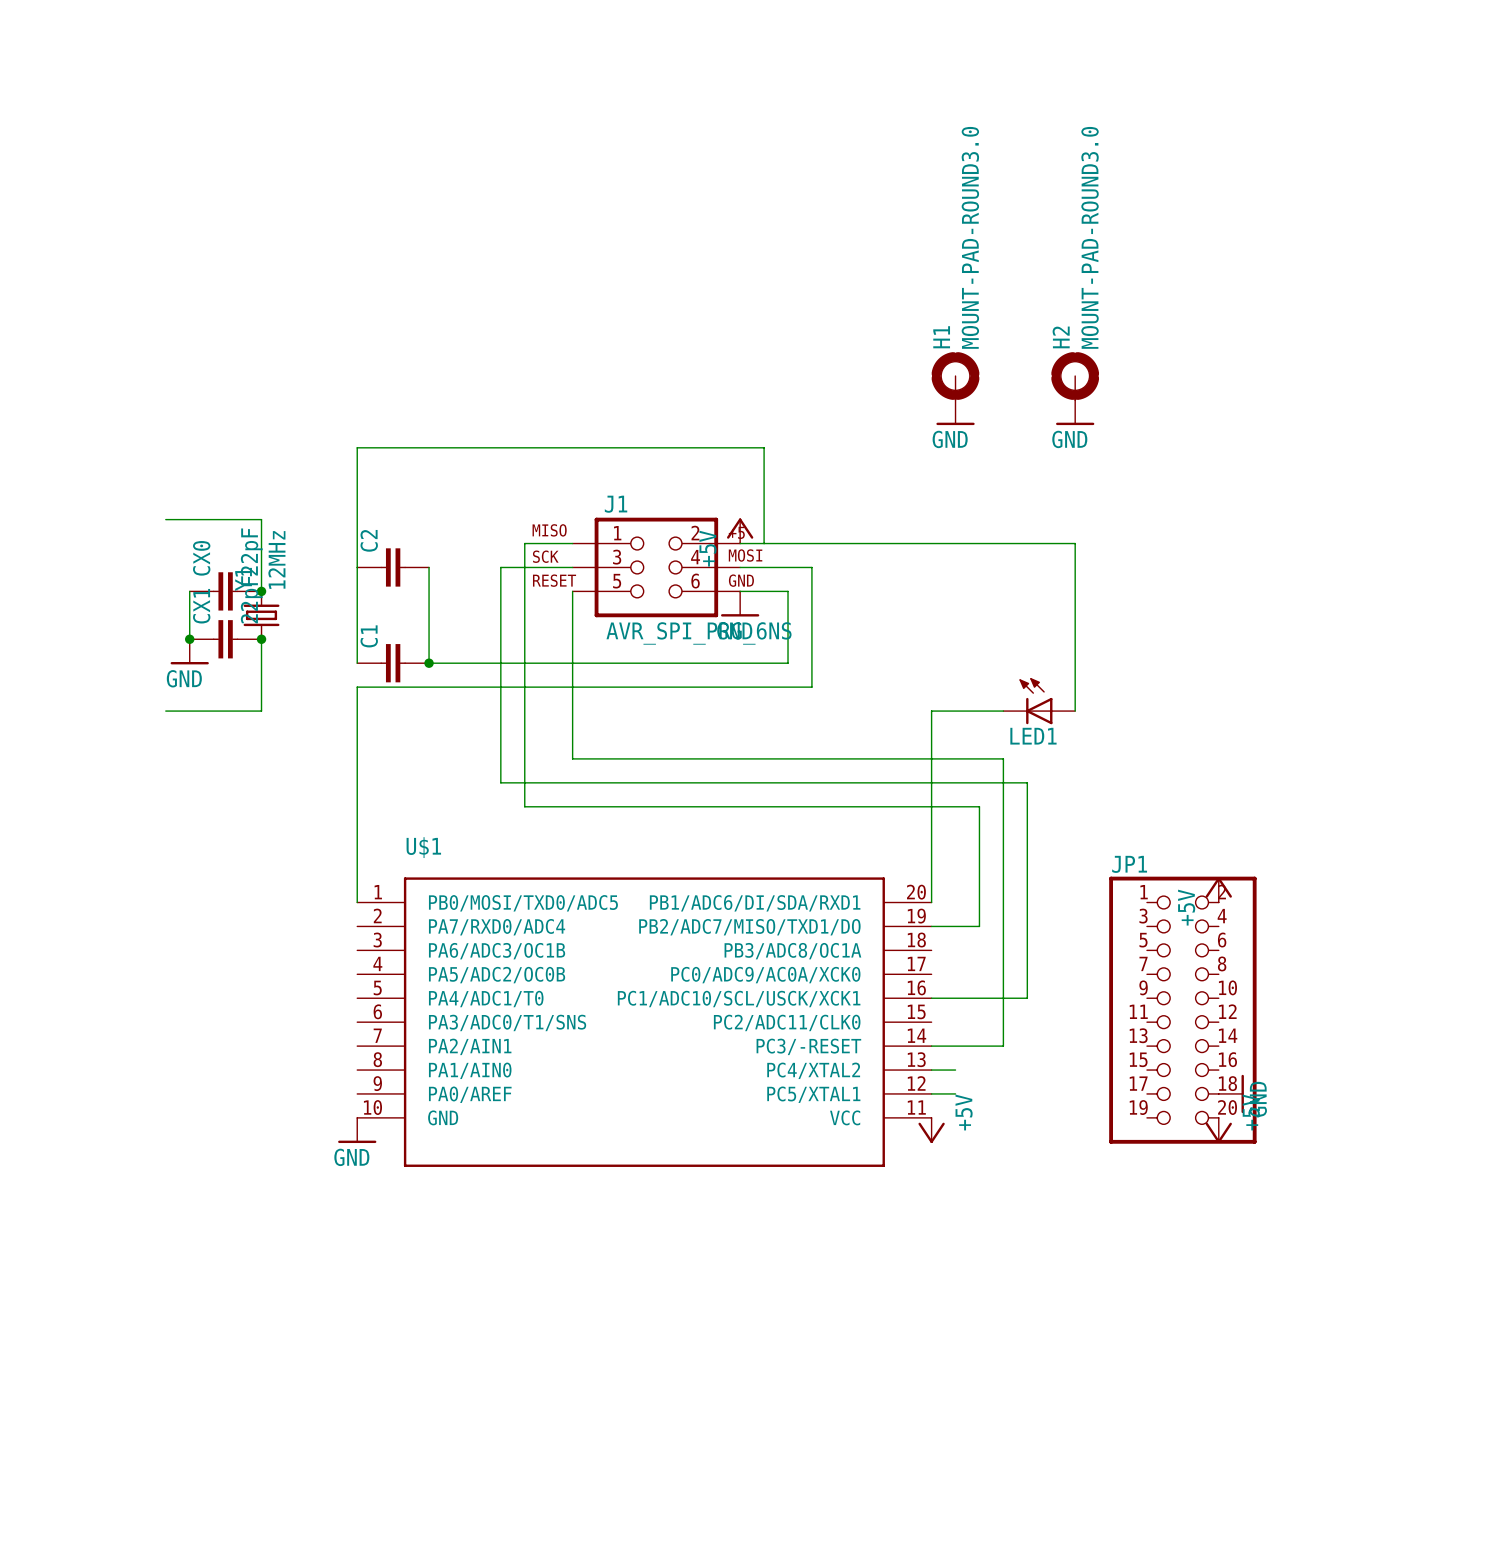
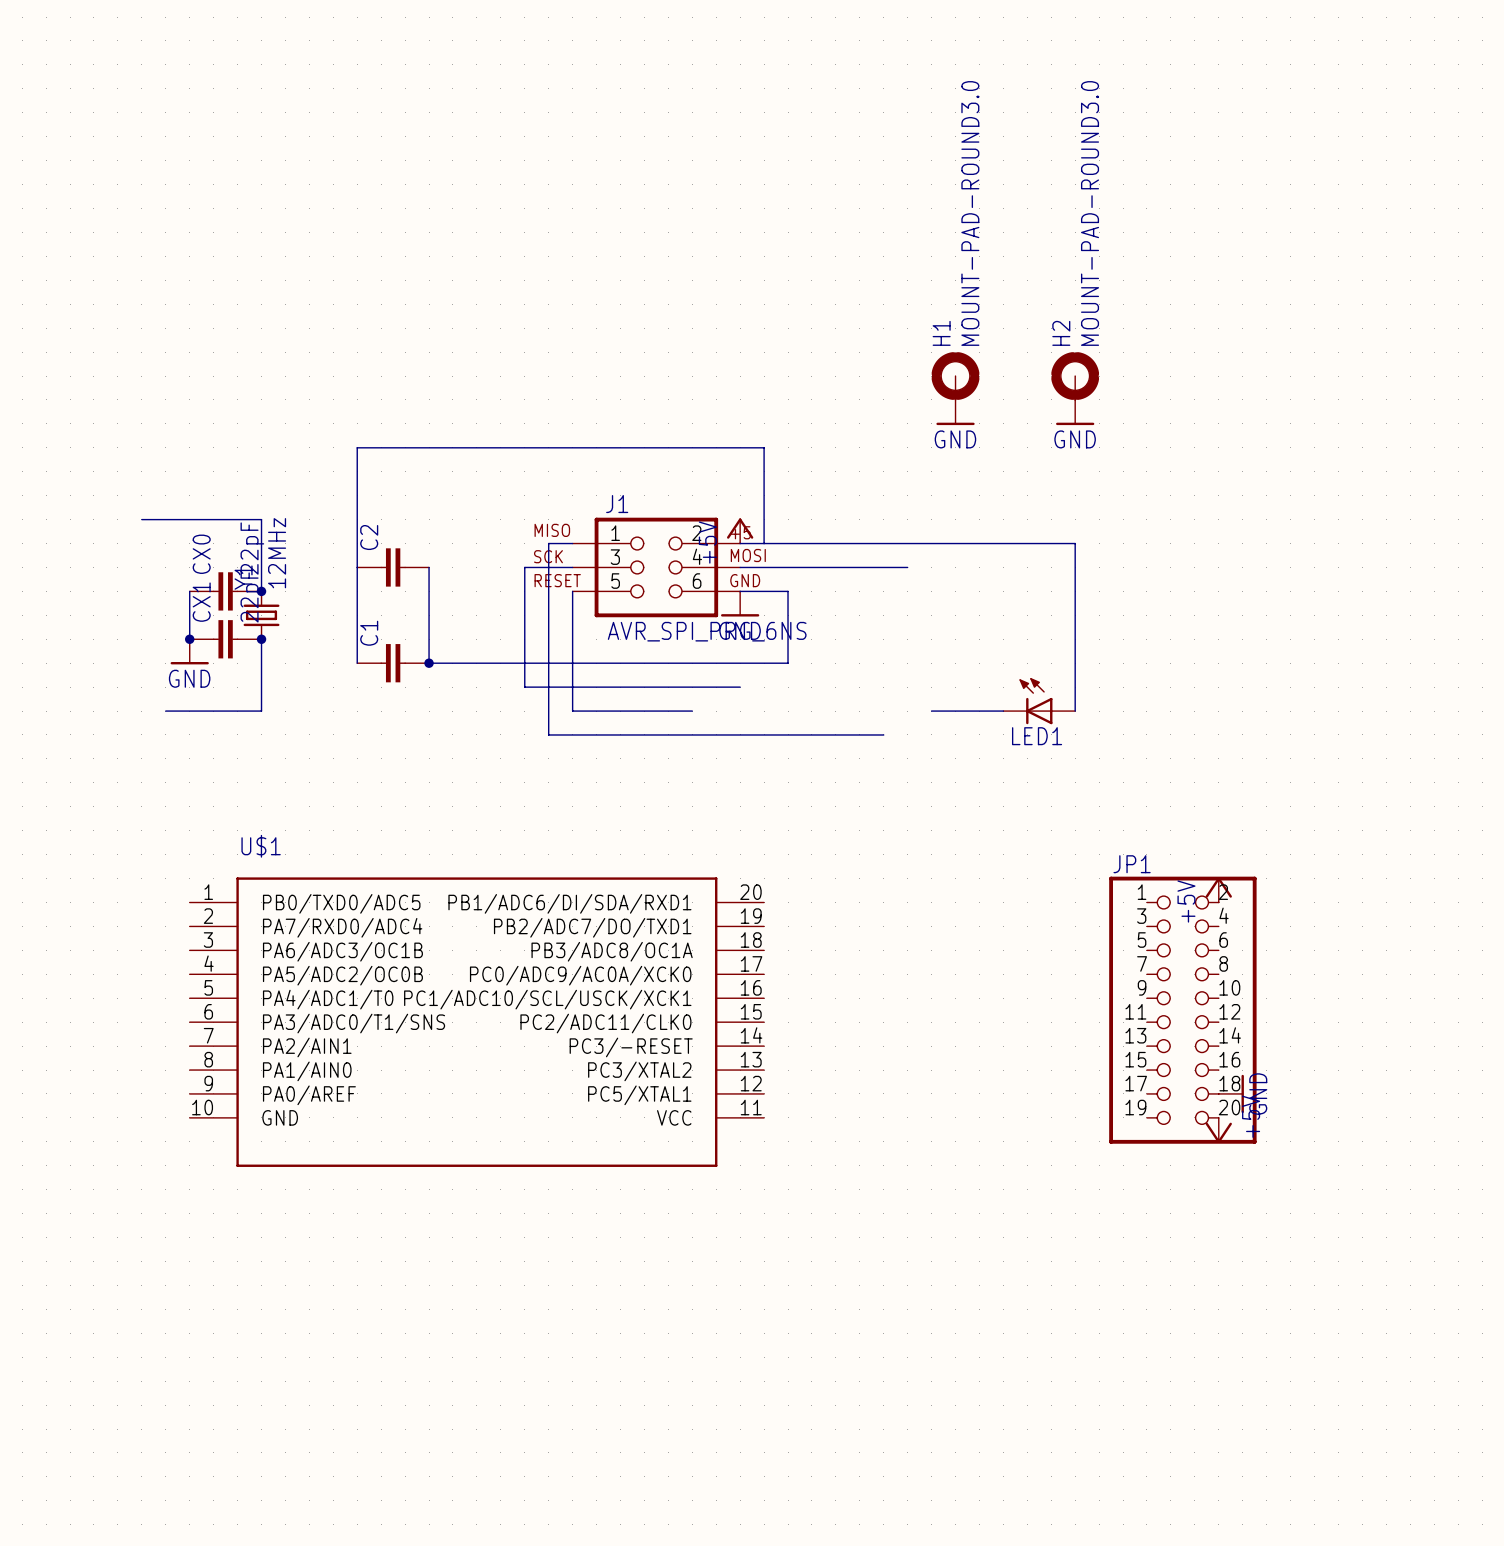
wire: none -> (141, 519) (165, 519)
wire: (548, 543) (524, 543) (524, 567) (500, 567) (500, 782) (1027, 782) (1027, 998) (931, 998) -> (548, 543) (548, 734) (883, 734)
wire: (811, 567) (811, 687) (740, 687) -> (811, 567) (907, 567)
wire: (572, 711) (572, 758) (1003, 758) (1003, 1046) (931, 1046) -> (572, 711) (692, 711)
wire: (931, 711) (931, 902) -> none
wire: (357, 902) (357, 687) (524, 687) (524, 806) (979, 806) (979, 926) (931, 926) -> none
U$1 pin name: PB0/MOSI/TXD0/ADC5 (523, 903) -> PB0/TXD0/ADC5 (341, 903)
U$1 pin name: PB2/ADC7/MISO/TXD1/DO (749, 927) -> PB2/ADC7/DO/TXD1 (592, 927)
U$1 position: (644, 1022) -> (476, 1022)
U$1 pin name: PC4/XTAL2 (813, 1070) -> PC3/XTAL2 (639, 1071)
wire: (931, 1070) (955, 1070) -> none
wire: (931, 1093) (955, 1093) -> none
power symbol: GND (357, 1130) -> none
power symbol: +5V (931, 1130) -> none

